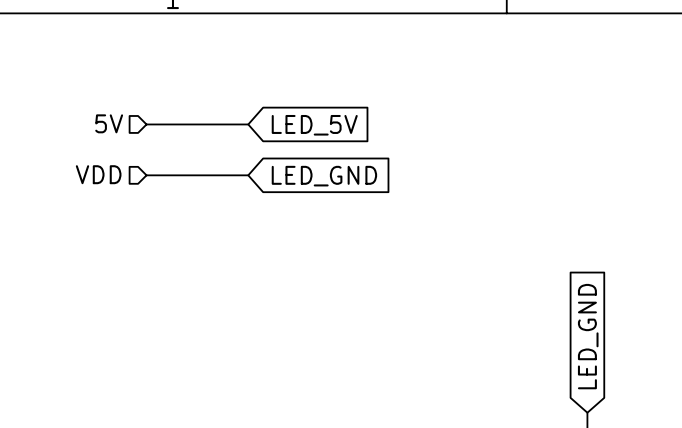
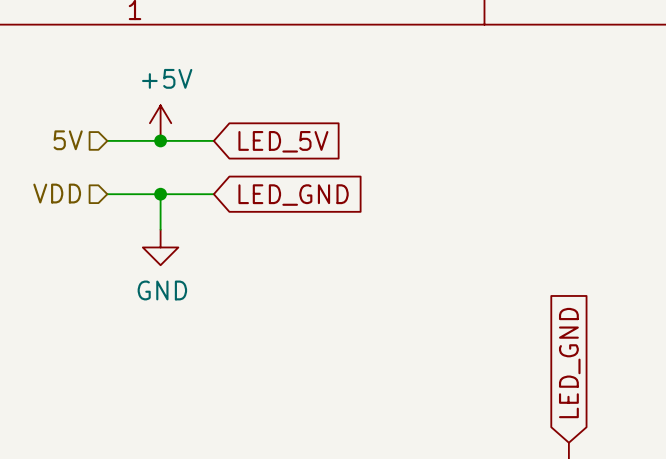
power symbol: none -> +5V (160, 123)
junction: none -> (160, 140)
wire: none -> (160, 194) (160, 229)
junction: none -> (160, 194)
power symbol: none -> GND (160, 247)

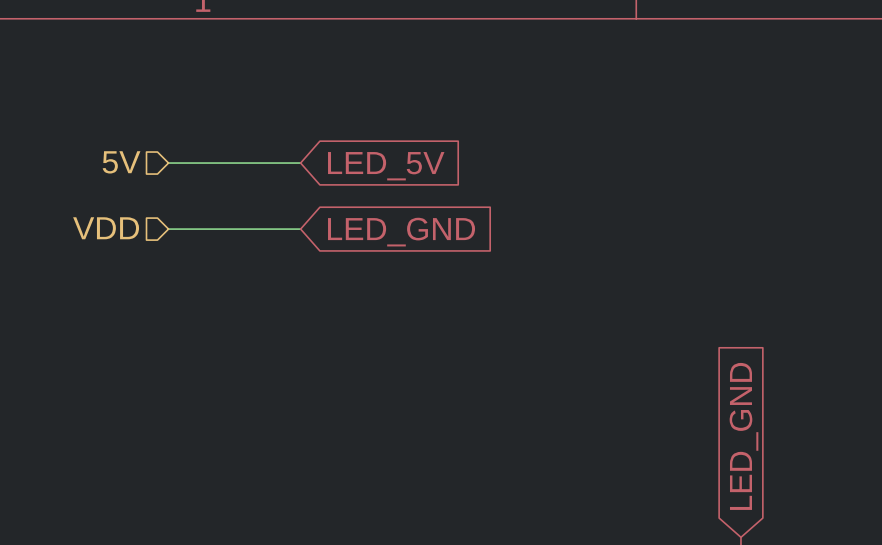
power symbol: +5V (160, 123) -> none
junction: (160, 140) -> none
wire: (160, 194) (160, 229) -> none
junction: (160, 194) -> none
power symbol: GND (160, 247) -> none

